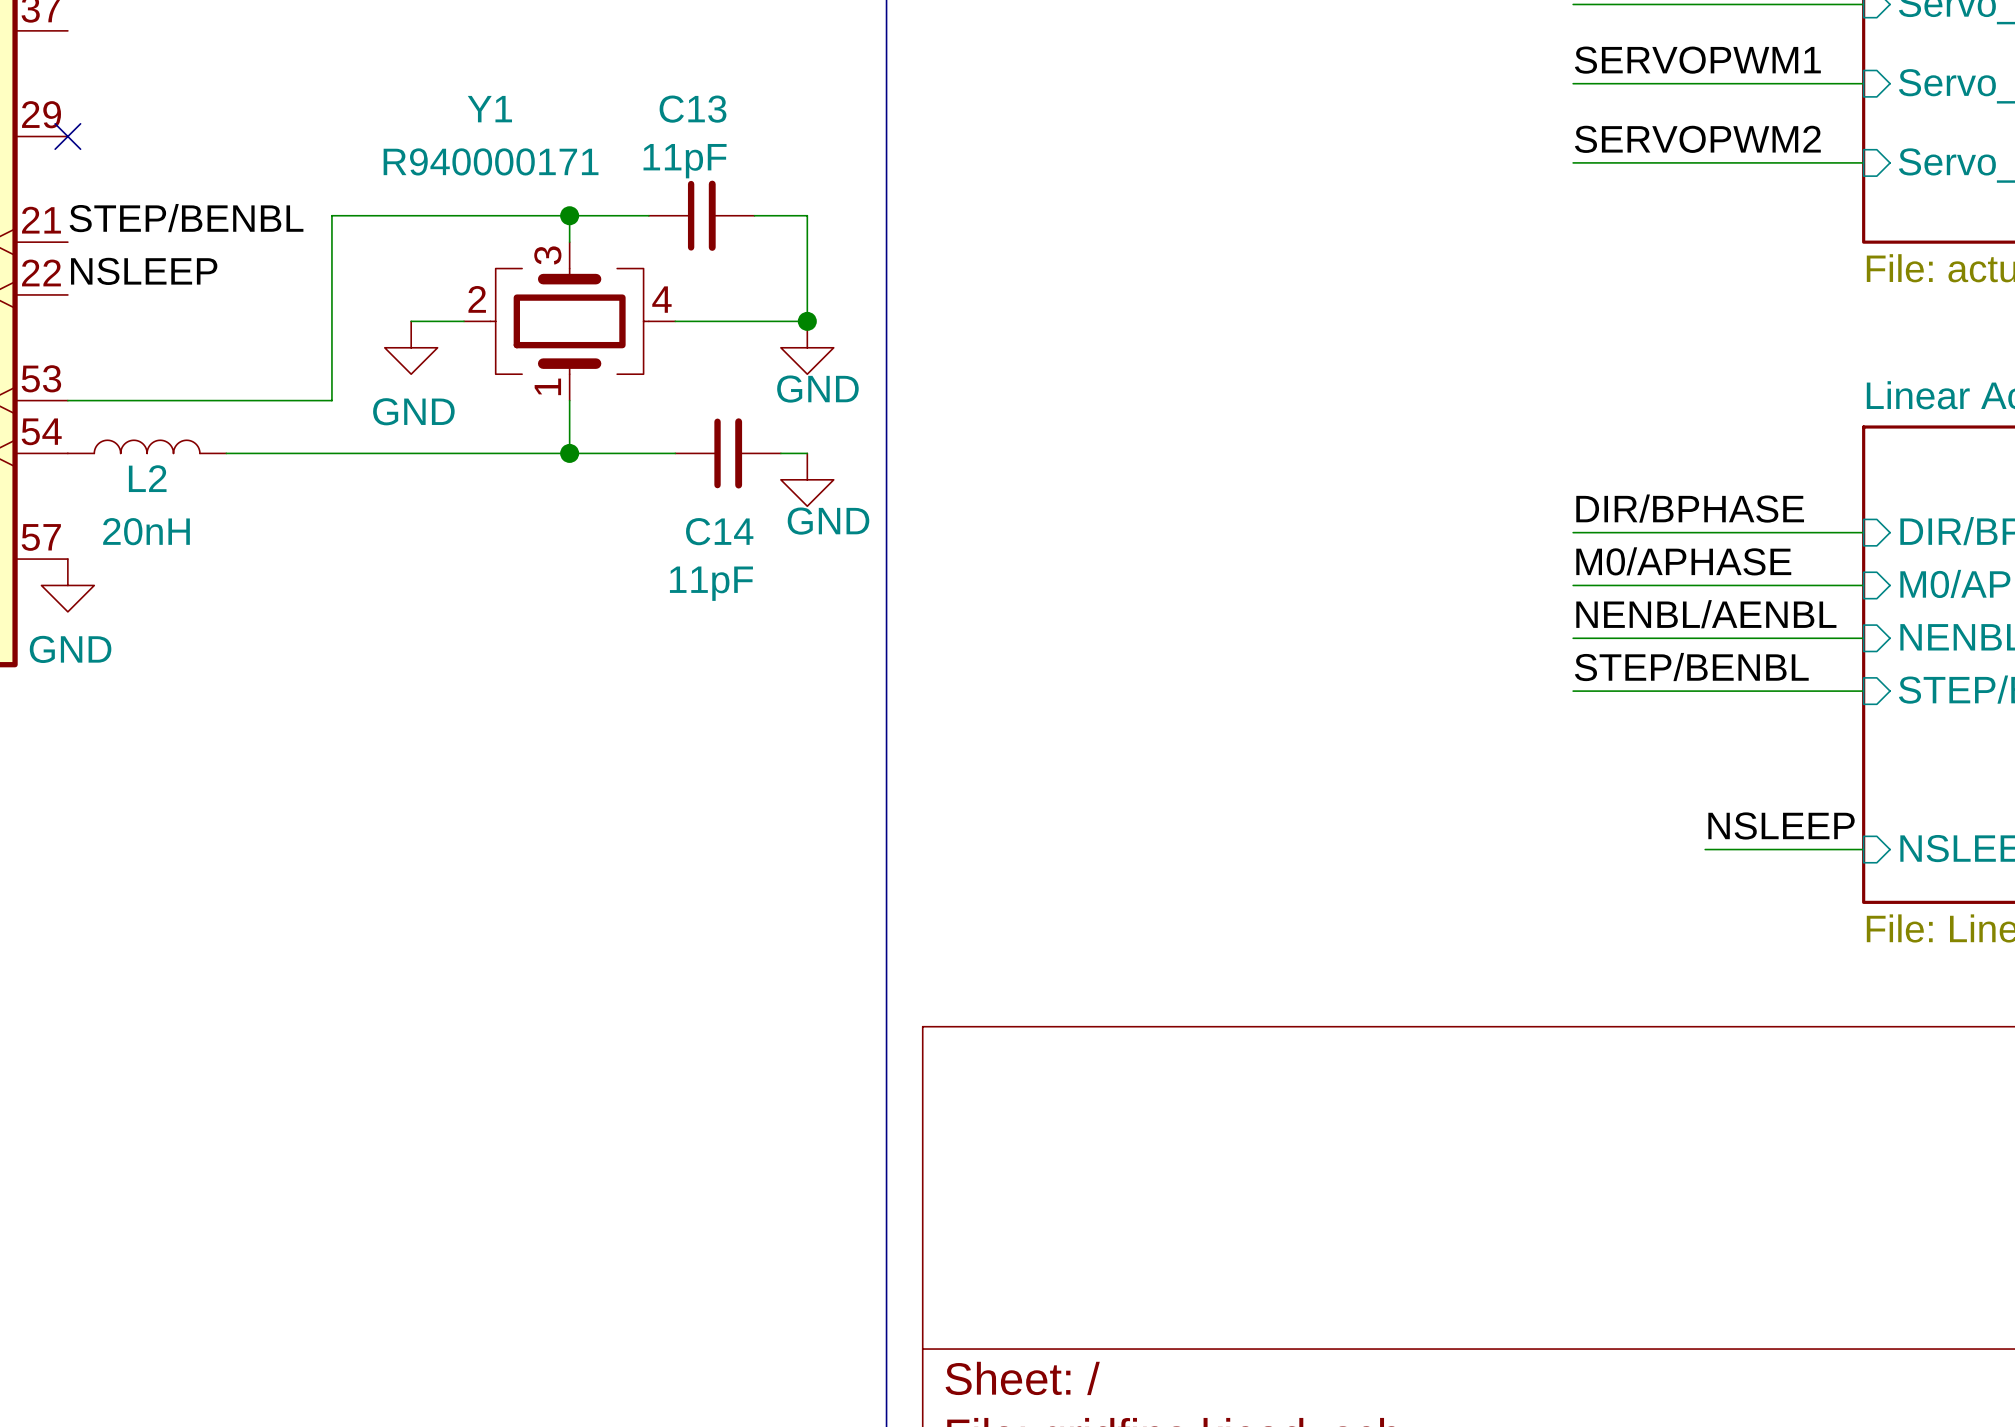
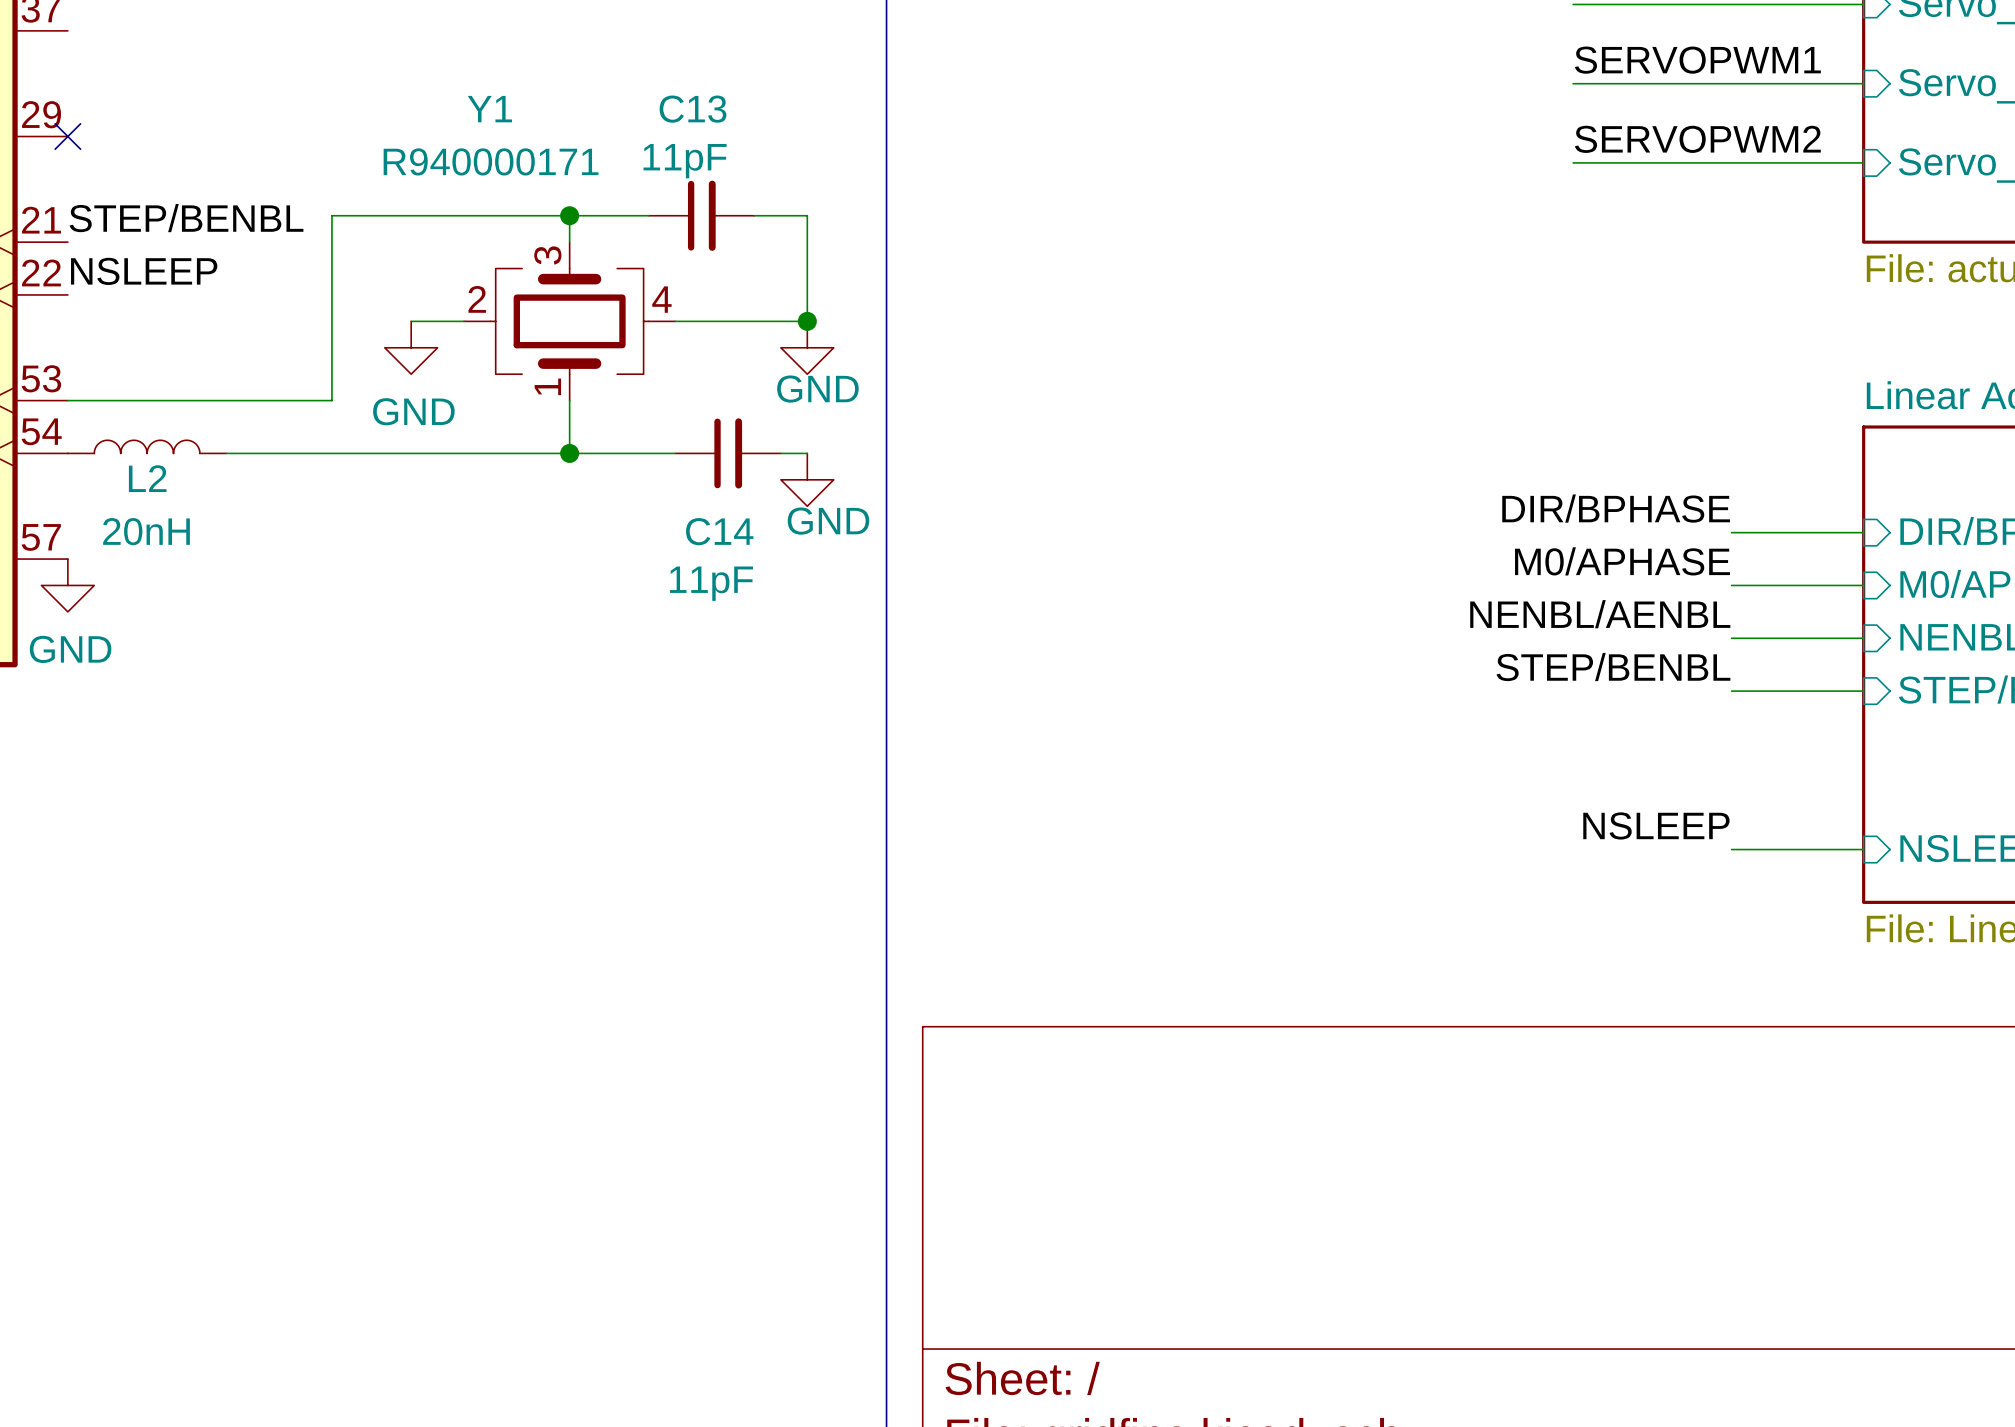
label position: DIR/BPHASE (1690, 508) -> DIR/BPHASE (1616, 508)
wire: (1573, 532) (1731, 532) -> none
label position: M0/APHASE (1683, 561) -> M0/APHASE (1622, 561)
wire: (1573, 585) (1731, 585) -> none
label position: NENBL/AENBL (1706, 614) -> NENBL/AENBL (1600, 614)
wire: (1573, 638) (1731, 638) -> none
label position: STEP/BENBL (1691, 667) -> STEP/BENBL (1613, 667)
wire: (1573, 691) (1731, 691) -> none
label position: NSLEEP (1781, 825) -> NSLEEP (1656, 825)
wire: (1705, 849) (1731, 849) -> none

